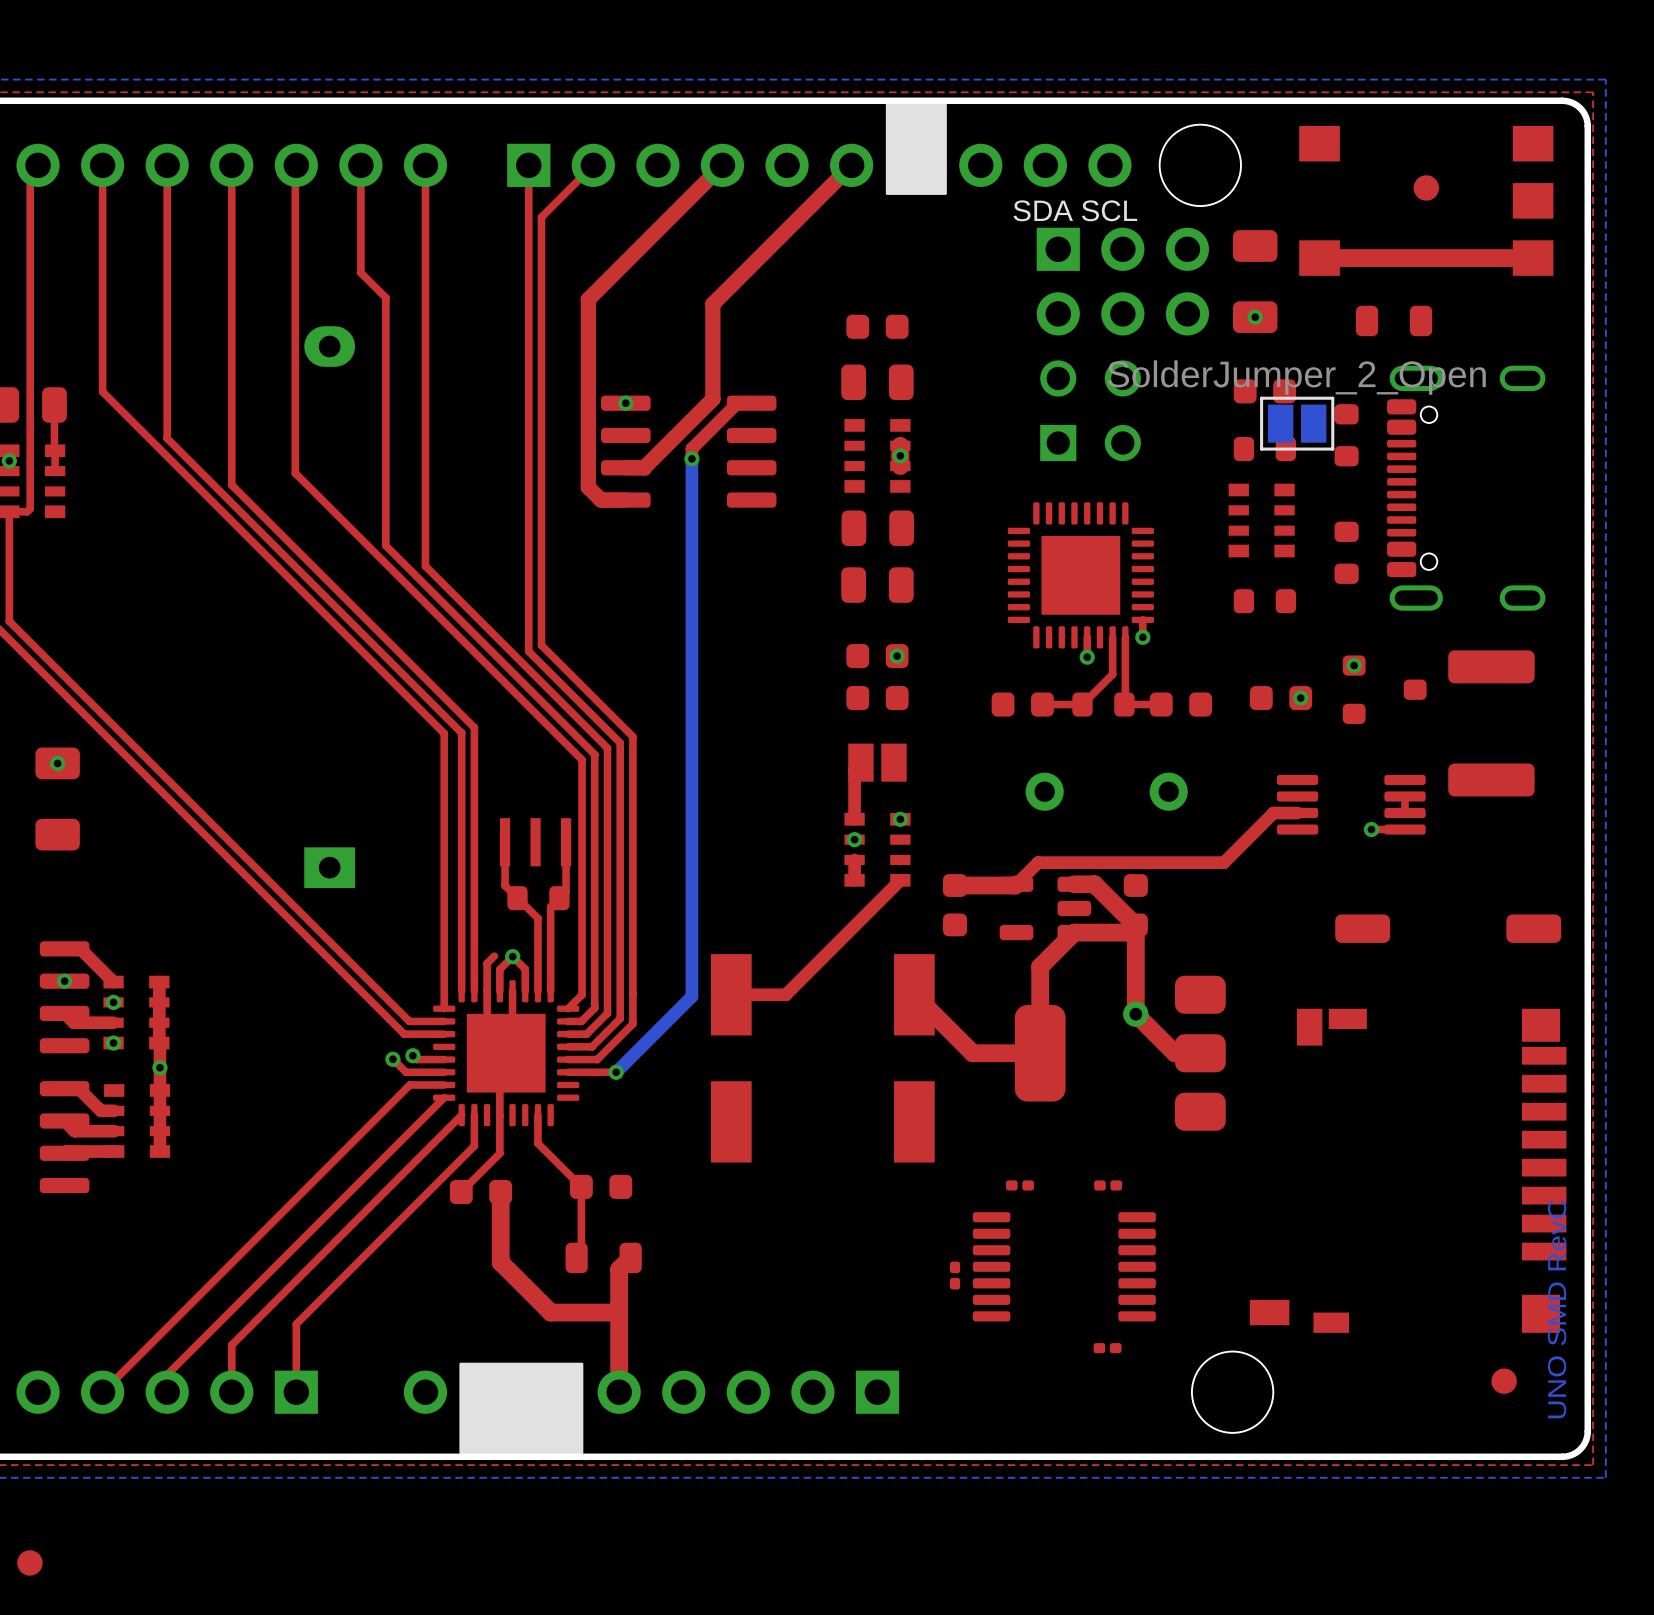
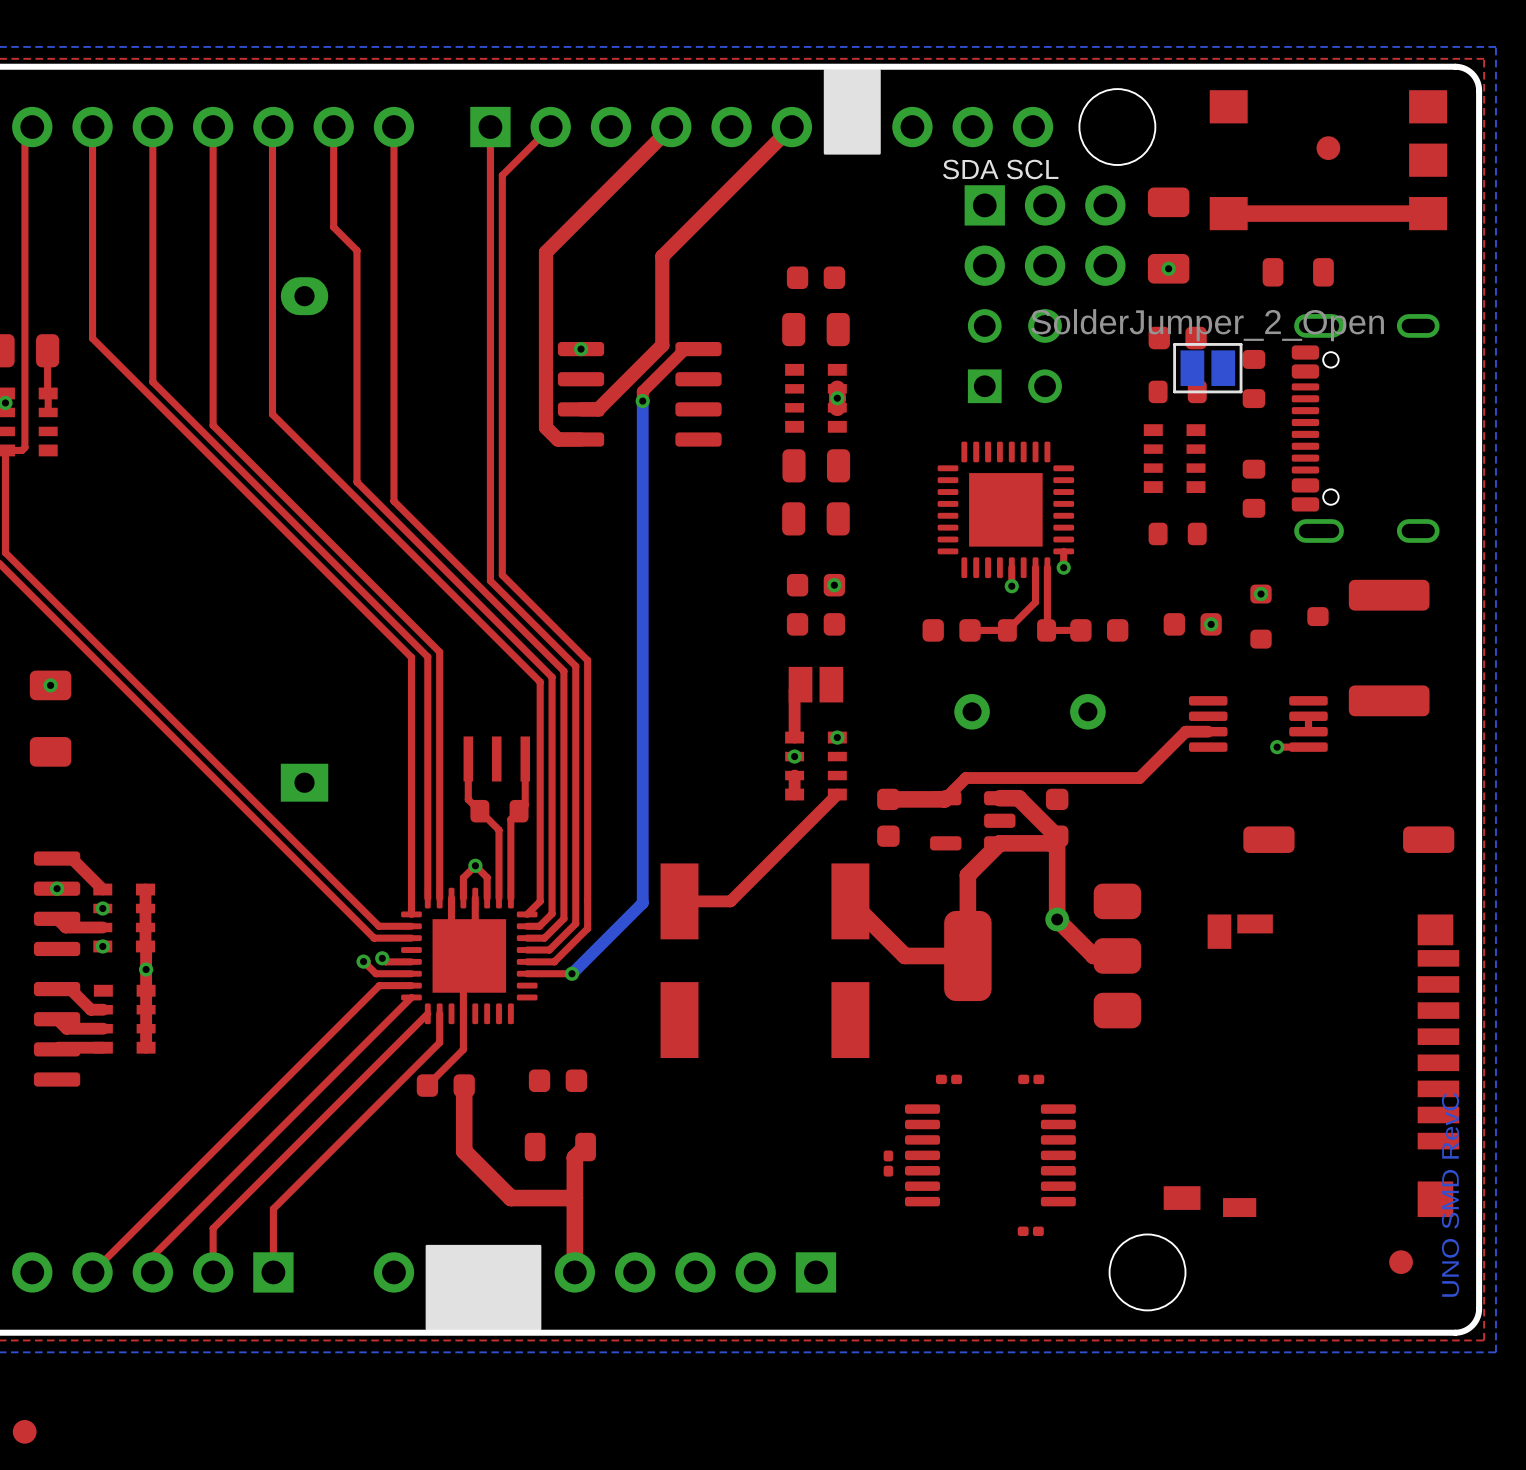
top track: (494, 956) (487, 963) (487, 991) -> none
top track: (537, 1115) (537, 1143) (581, 1186) (581, 1253) (576, 1257) -> none

